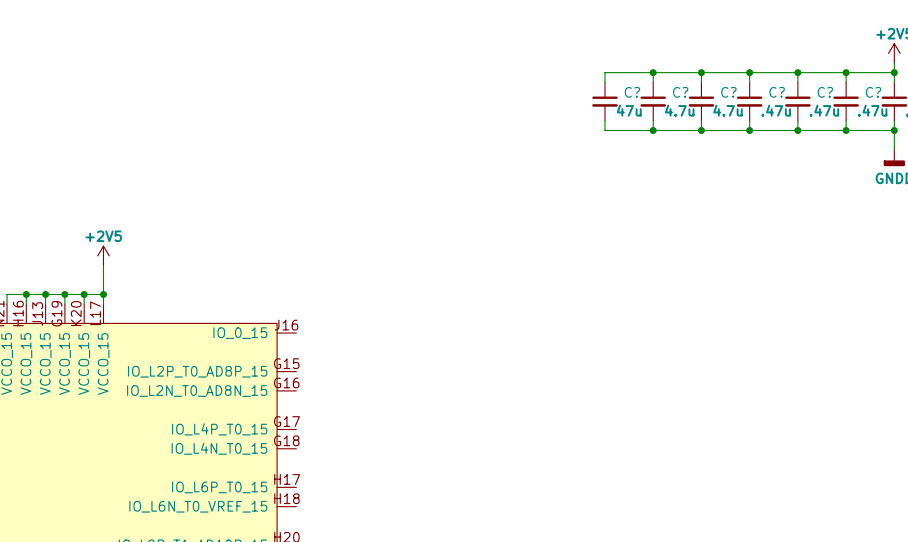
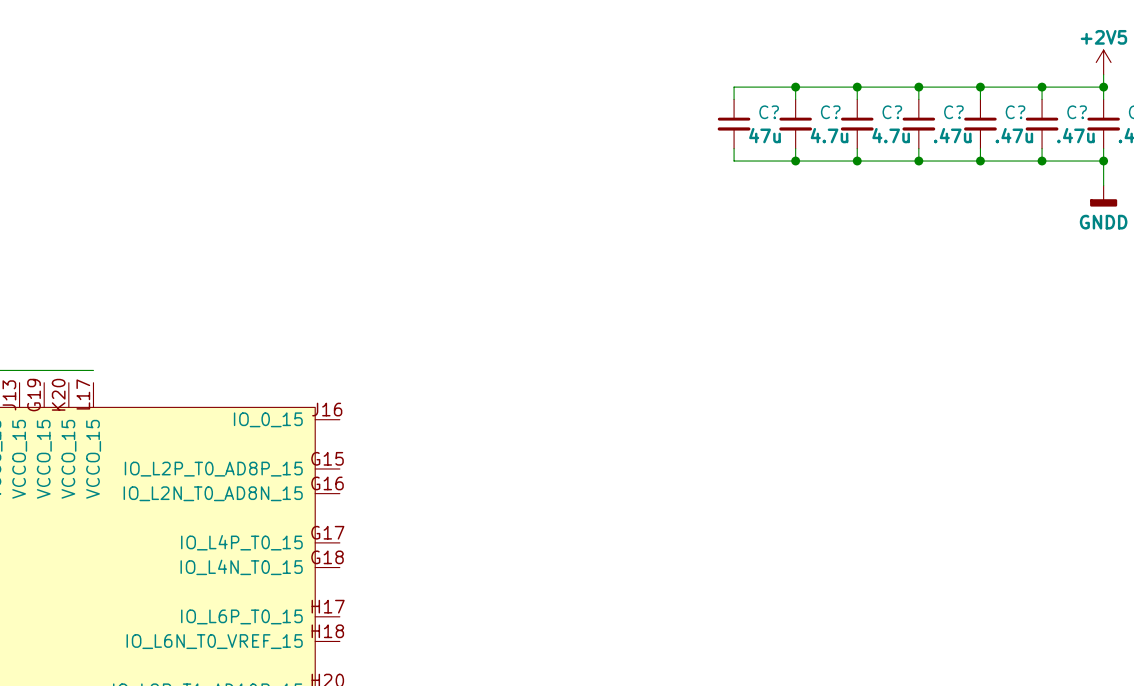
power symbol: +2V5 (103, 255) -> none
wire: (103, 265) (103, 304) -> none
wire: (45, 294) (45, 304) -> none
junction: (45, 294) -> none
wire: (64, 294) (64, 304) -> none
junction: (64, 294) -> none
wire: (84, 294) (84, 304) -> none
junction: (84, 294) -> none
junction: (103, 294) -> none

